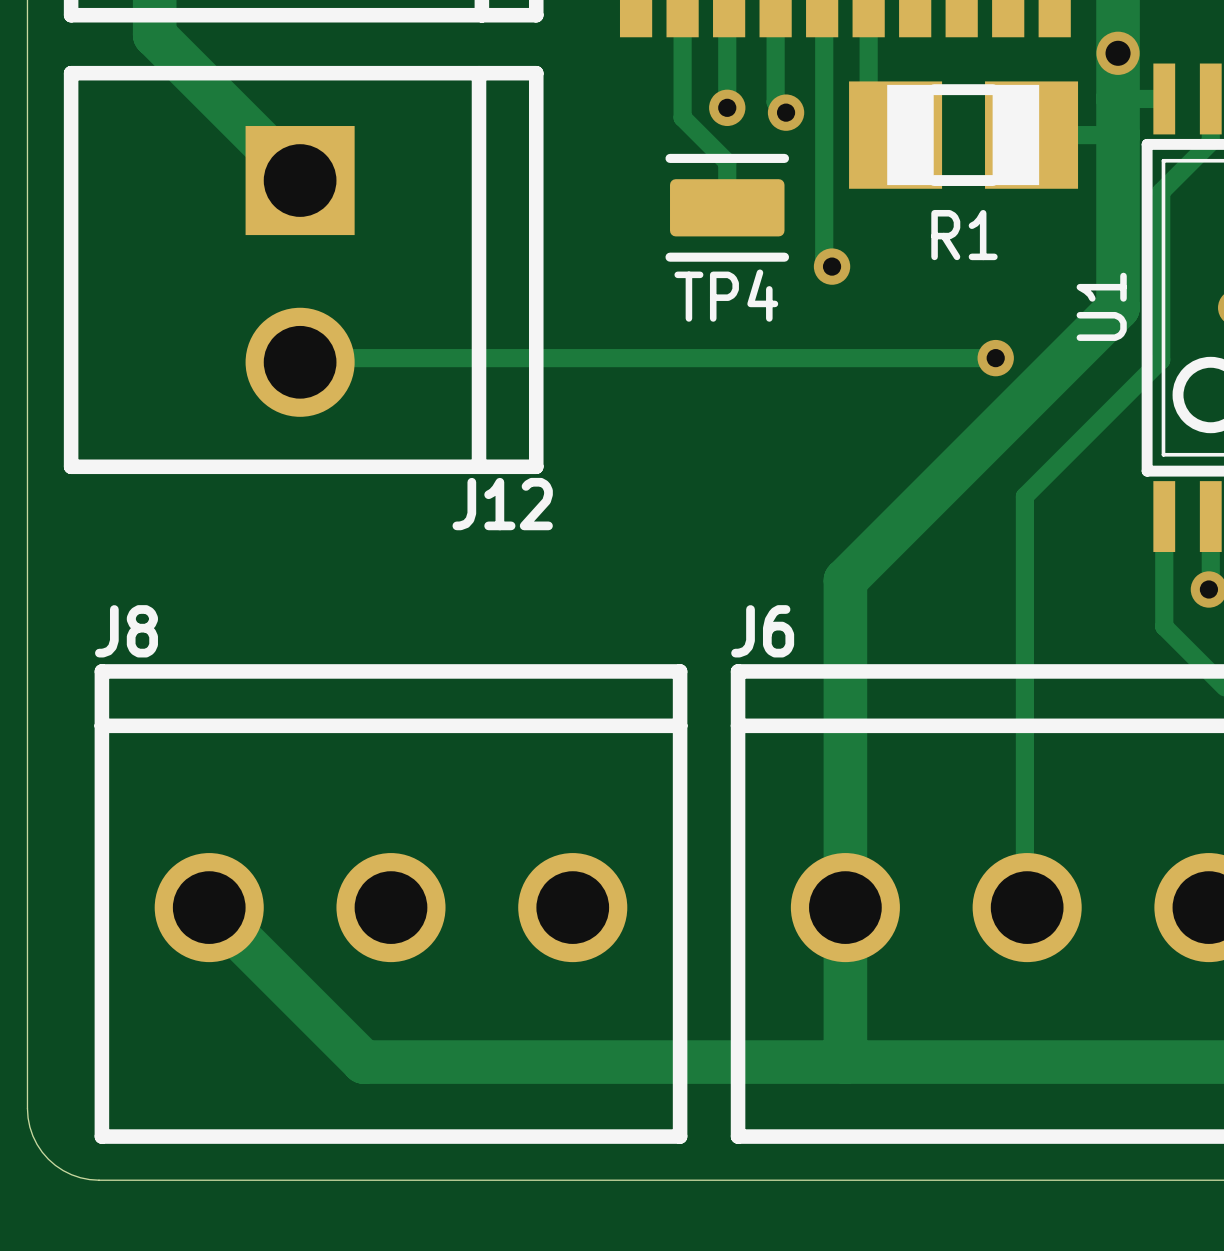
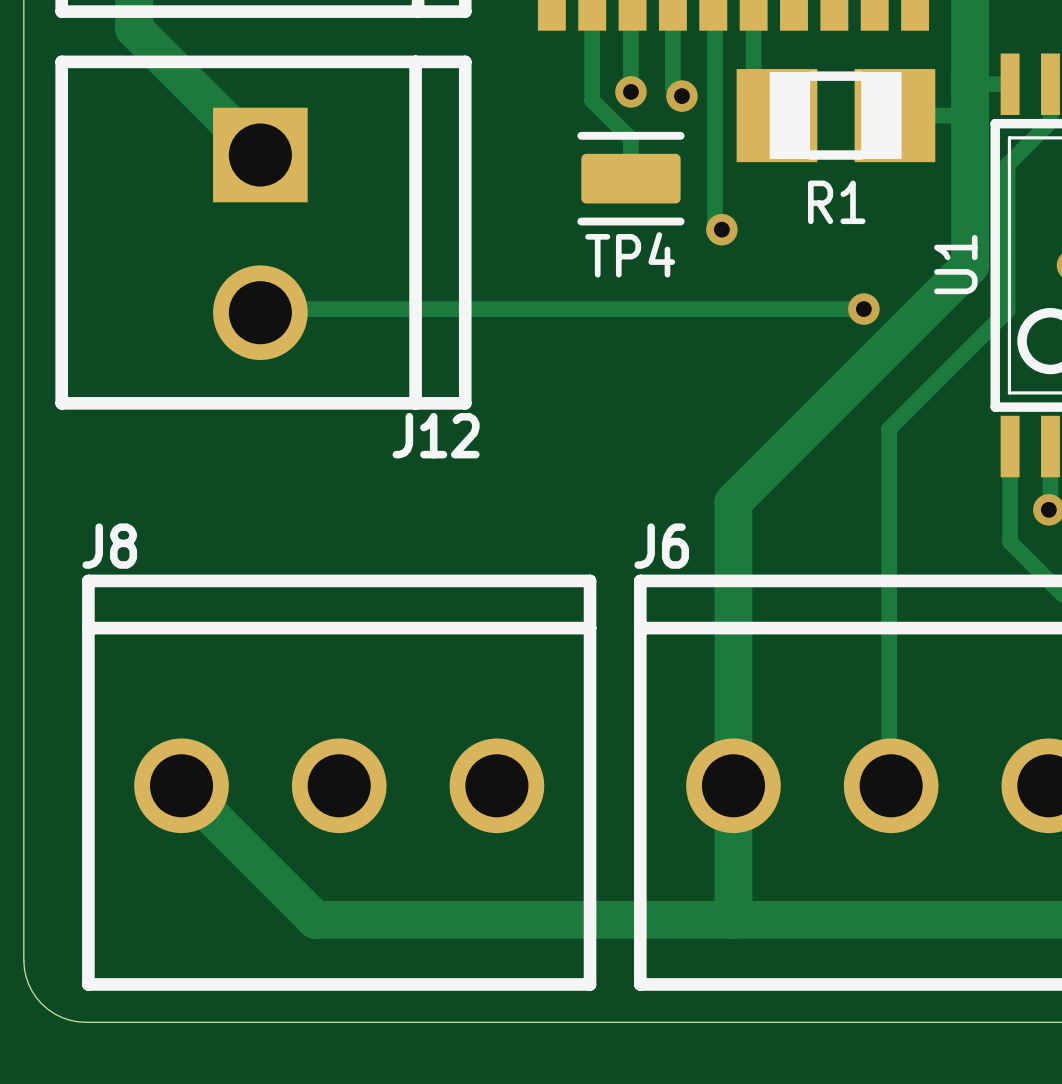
via: (1118, 53) -> none

